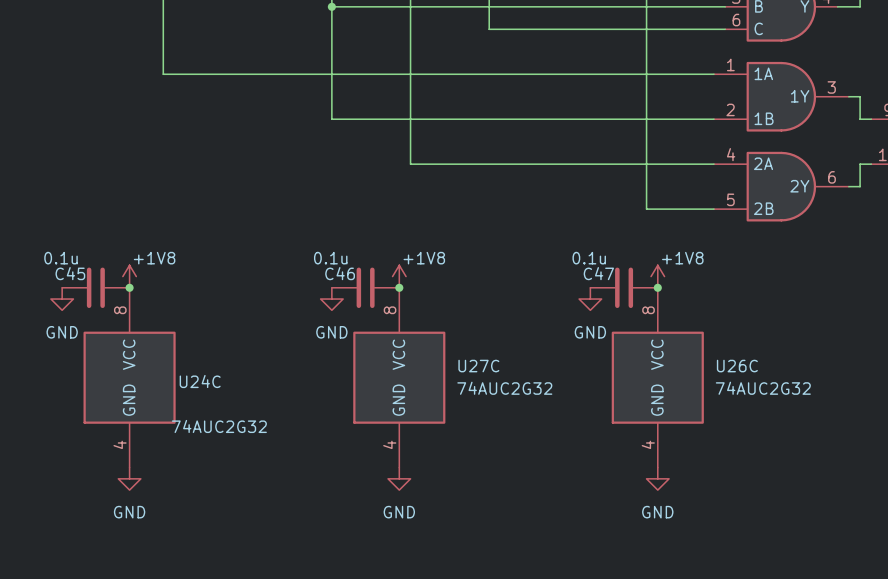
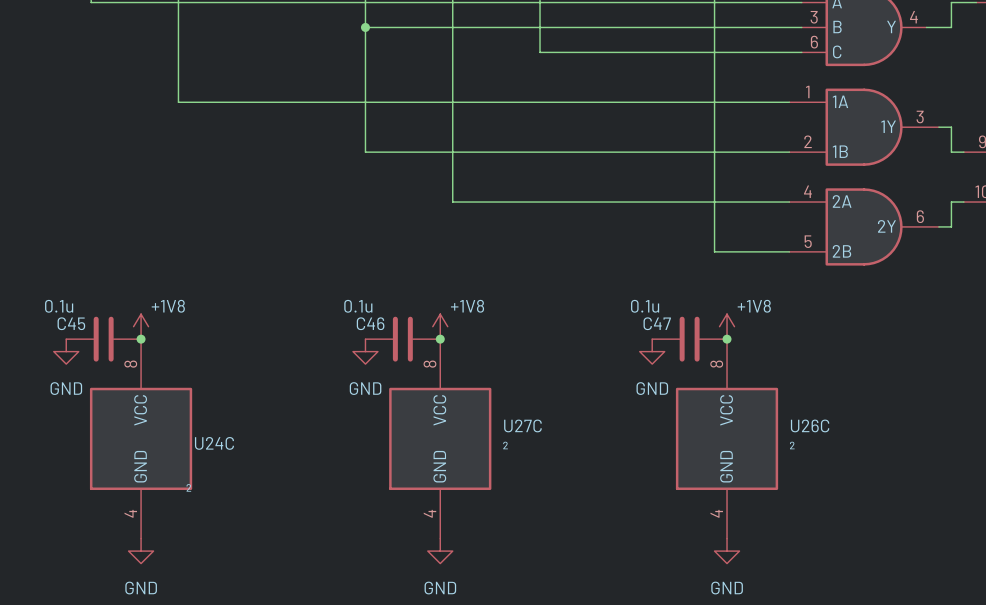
U27C value: 74AUC2G32 (504, 388) -> ² (505, 445)
U26C value: 74AUC2G32 (763, 388) -> ² (792, 445)
U24C value: 74AUC2G32 (219, 426) -> ² (188, 487)

